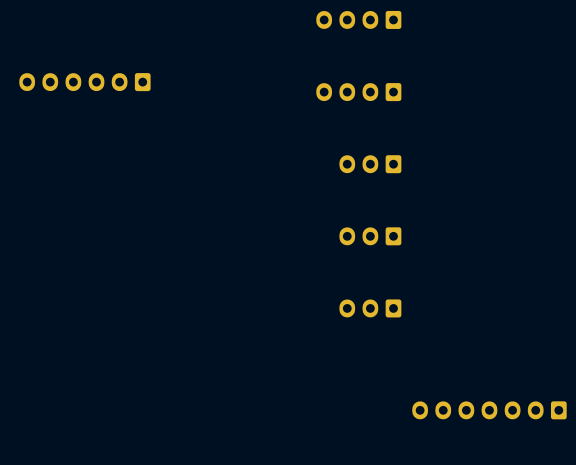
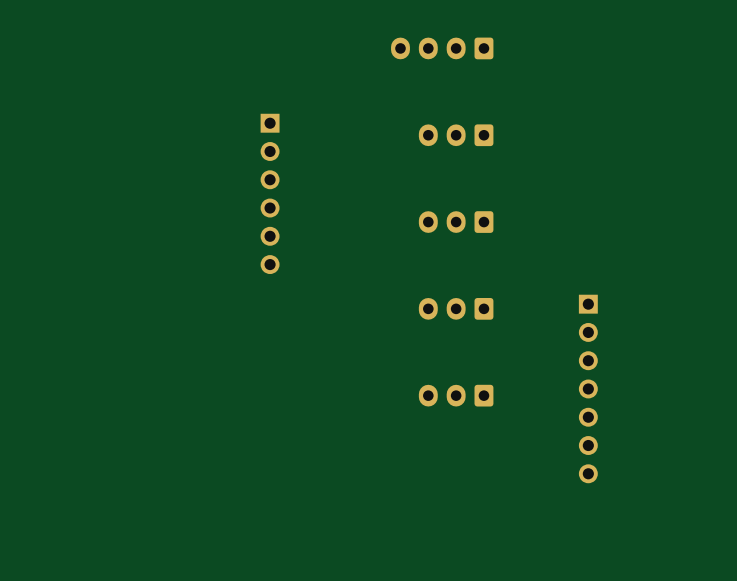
part: (84, 82) -> none
part: (358, 92) -> none
part: none -> (270, 193)
part: none -> (588, 388)
part: (489, 410) -> none

